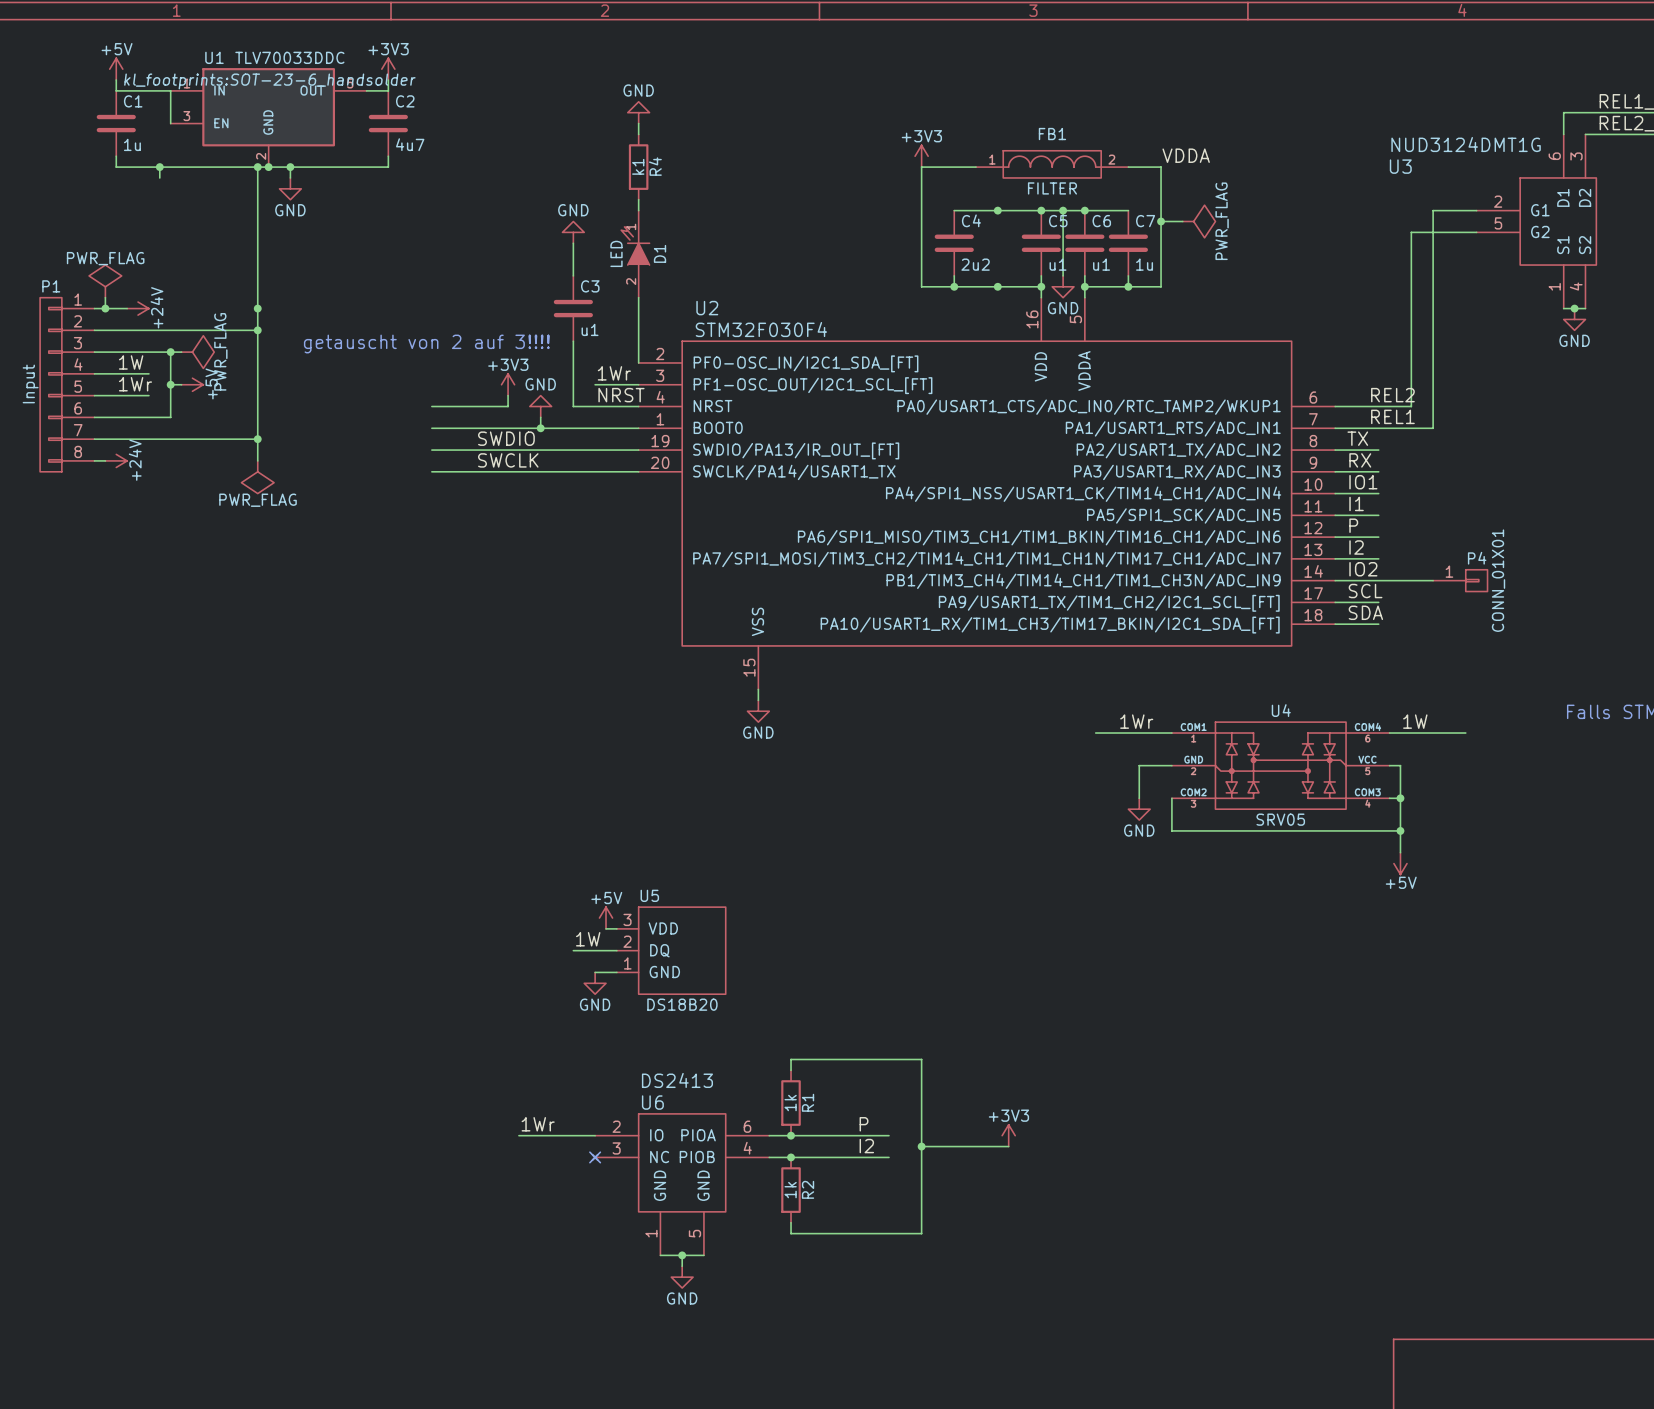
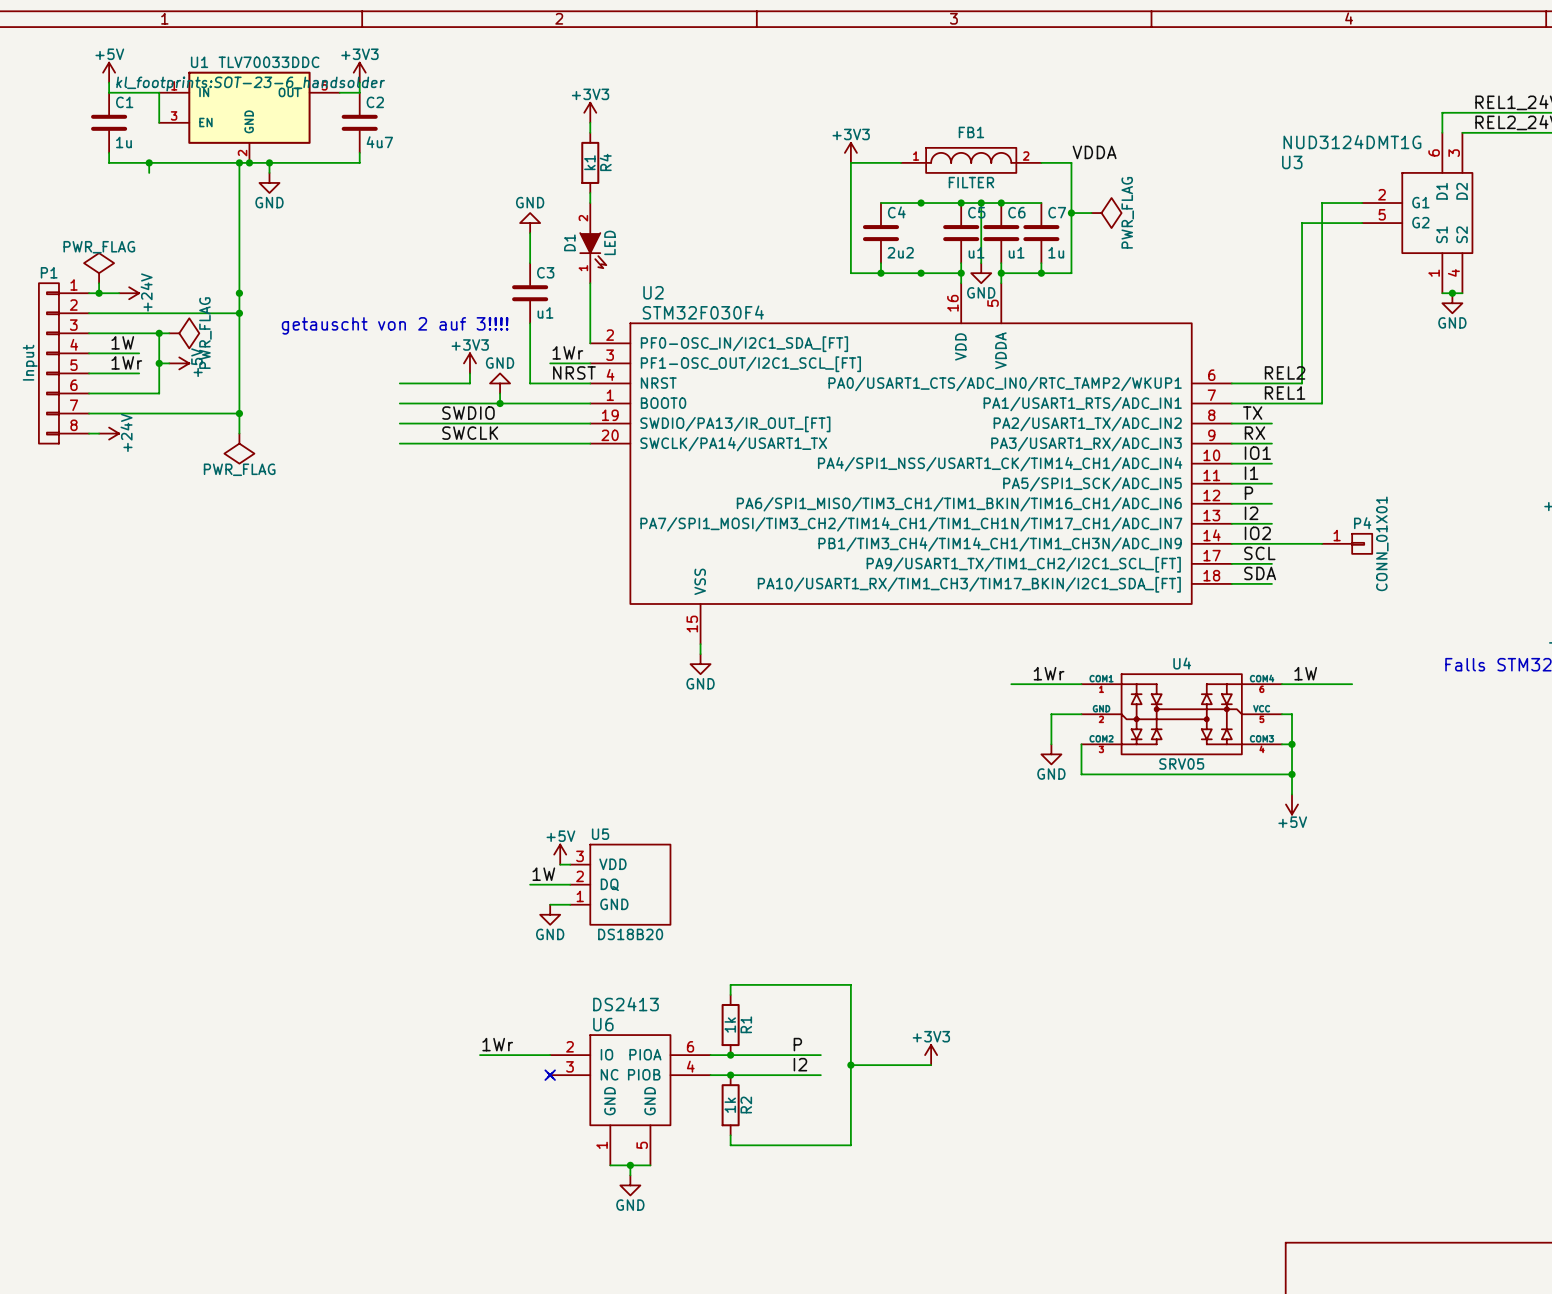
power symbol: GND (638, 112) -> +3V3 (590, 112)
D1 rotation: 0° (635, 245) -> 180° (593, 250)

